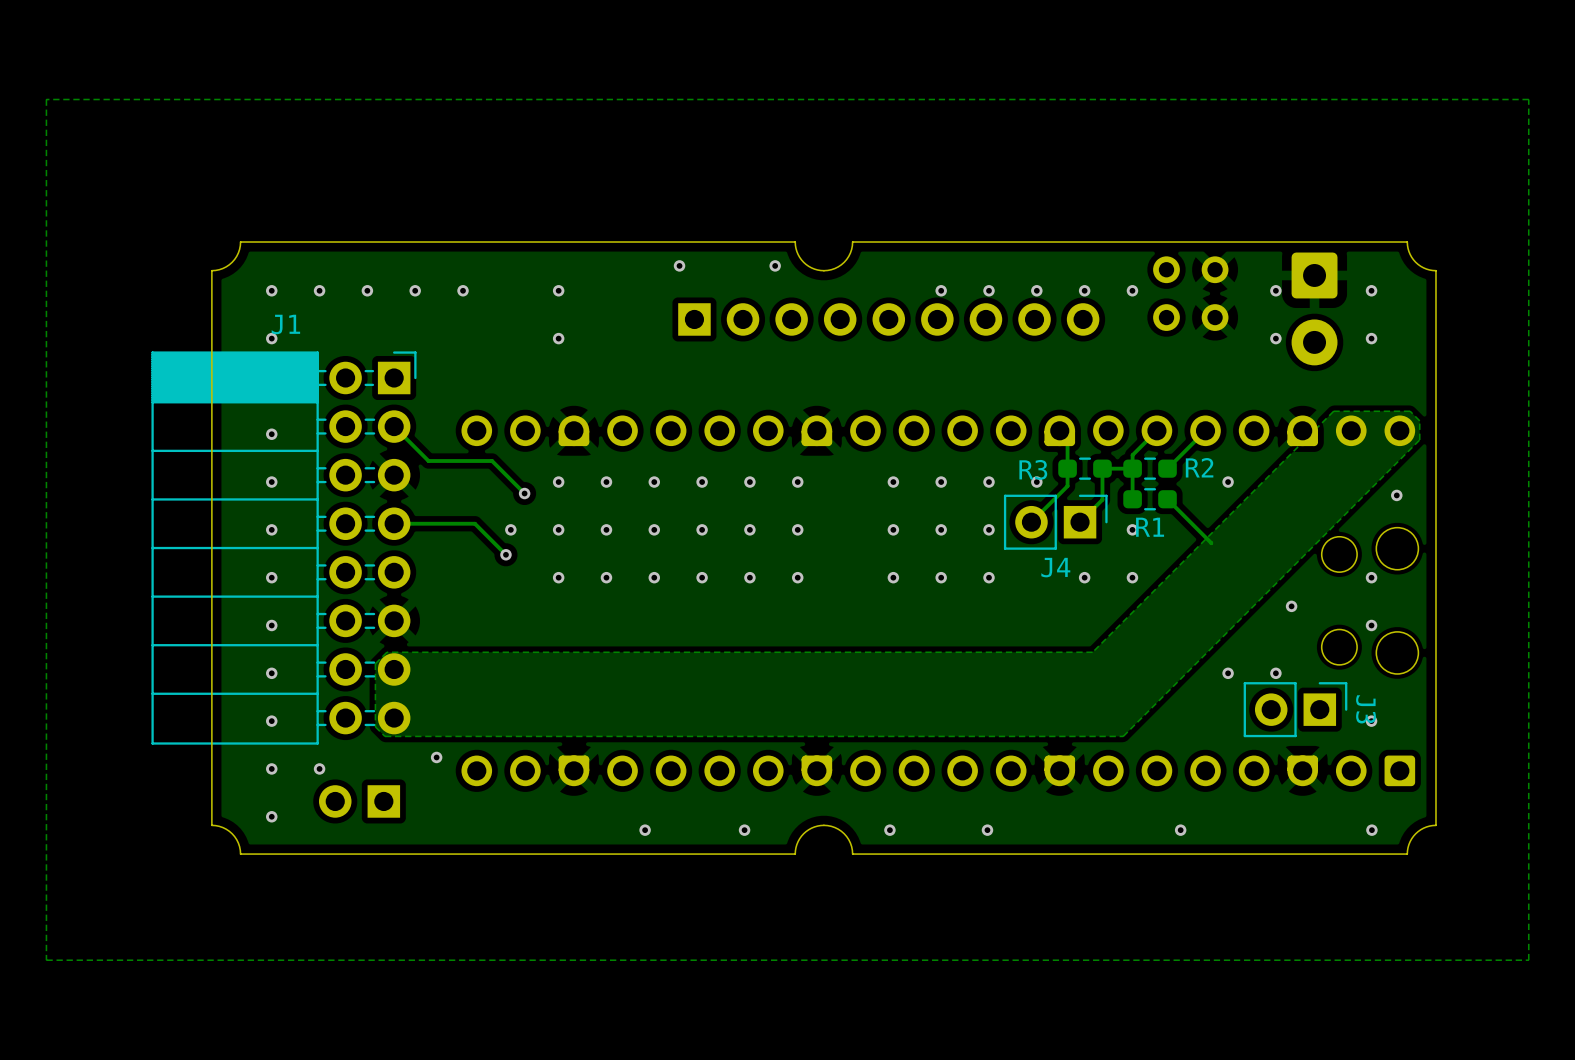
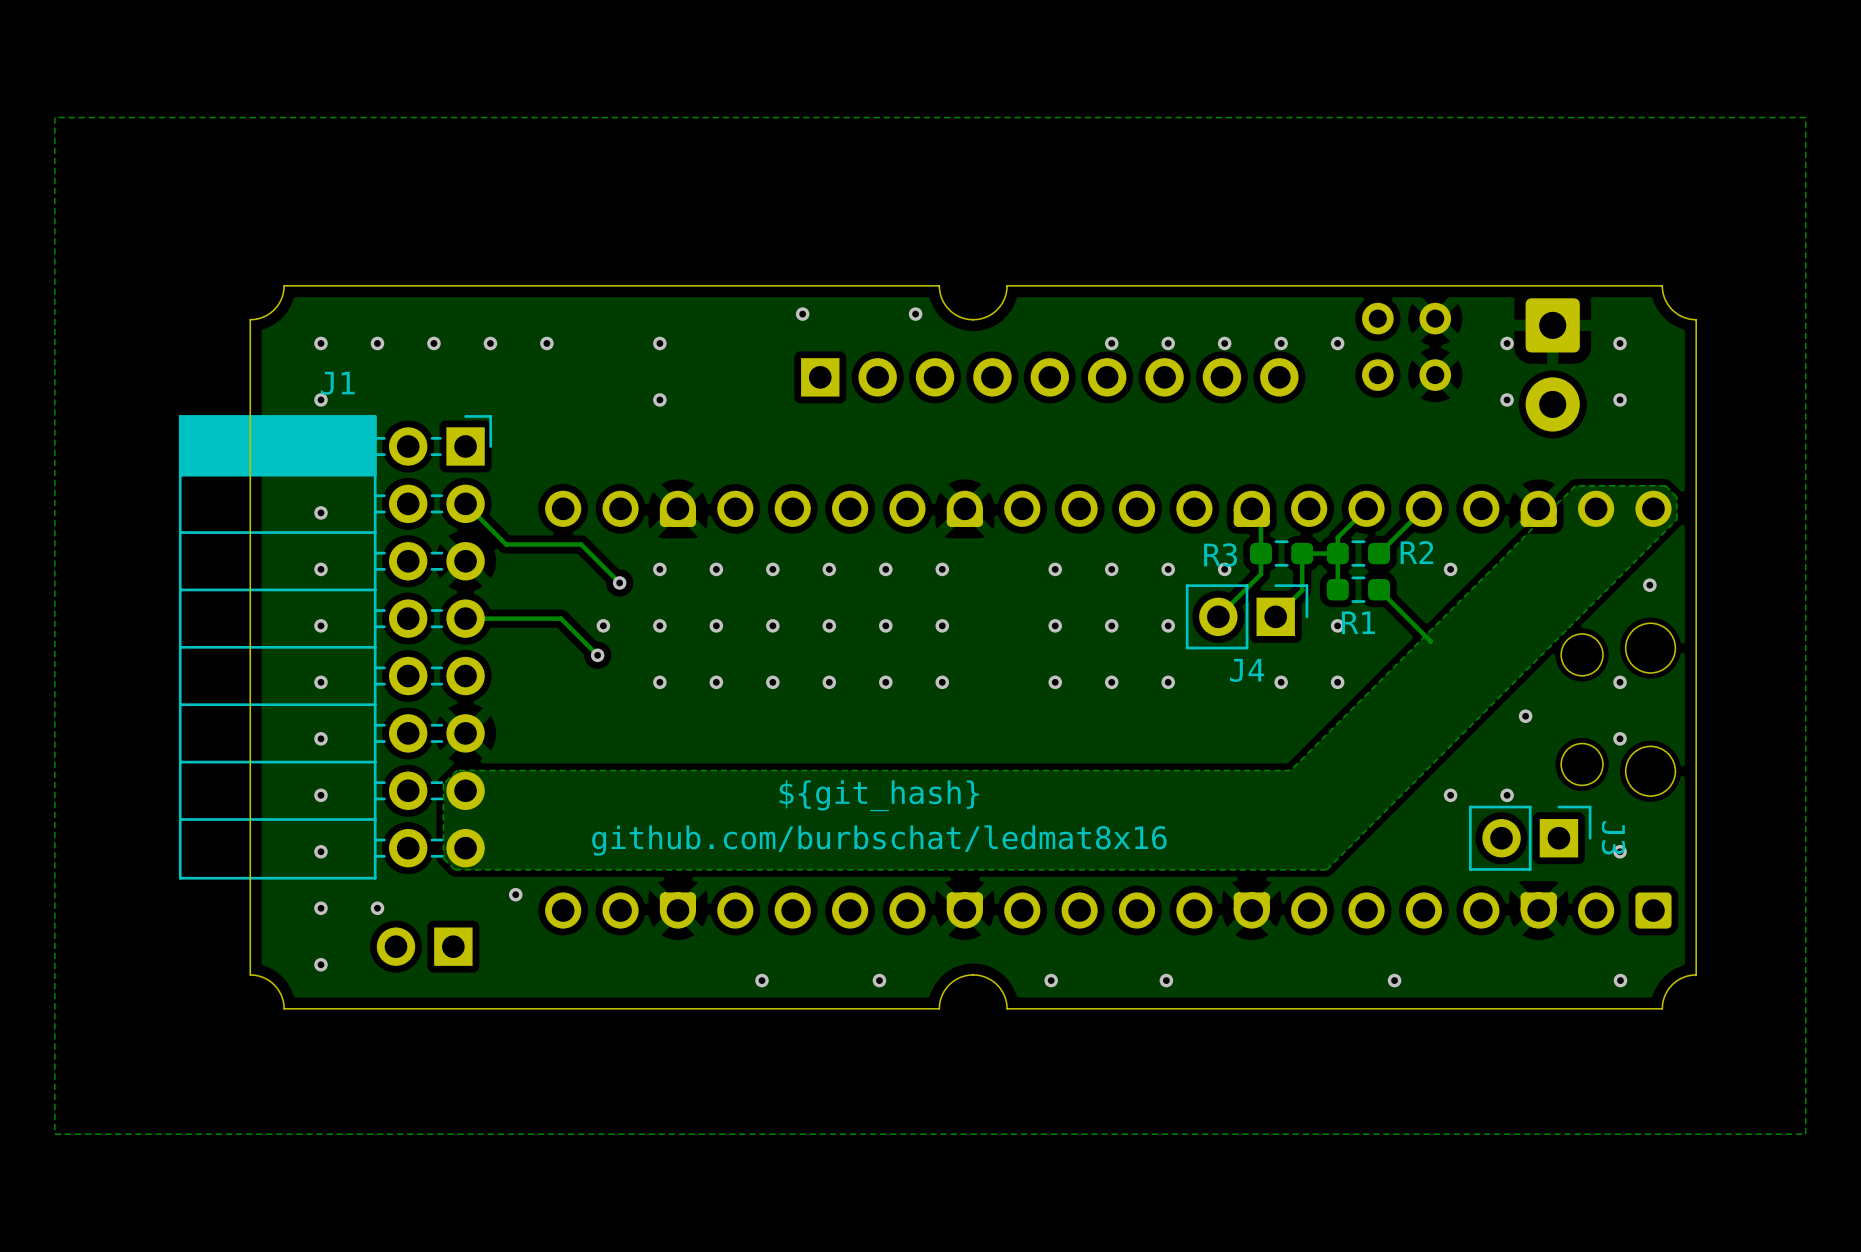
text: none -> ${git_hash} (879, 795)
text: none -> github.com/burbschat/ledmat8x16 (879, 840)

